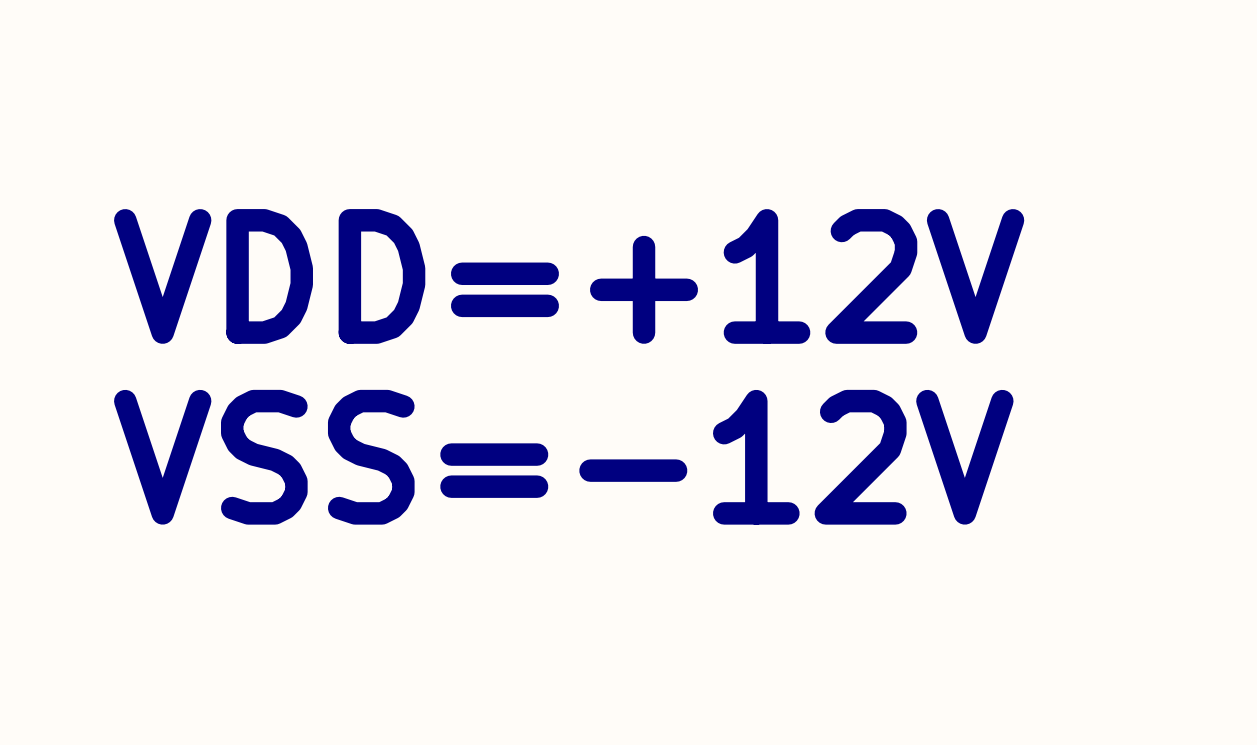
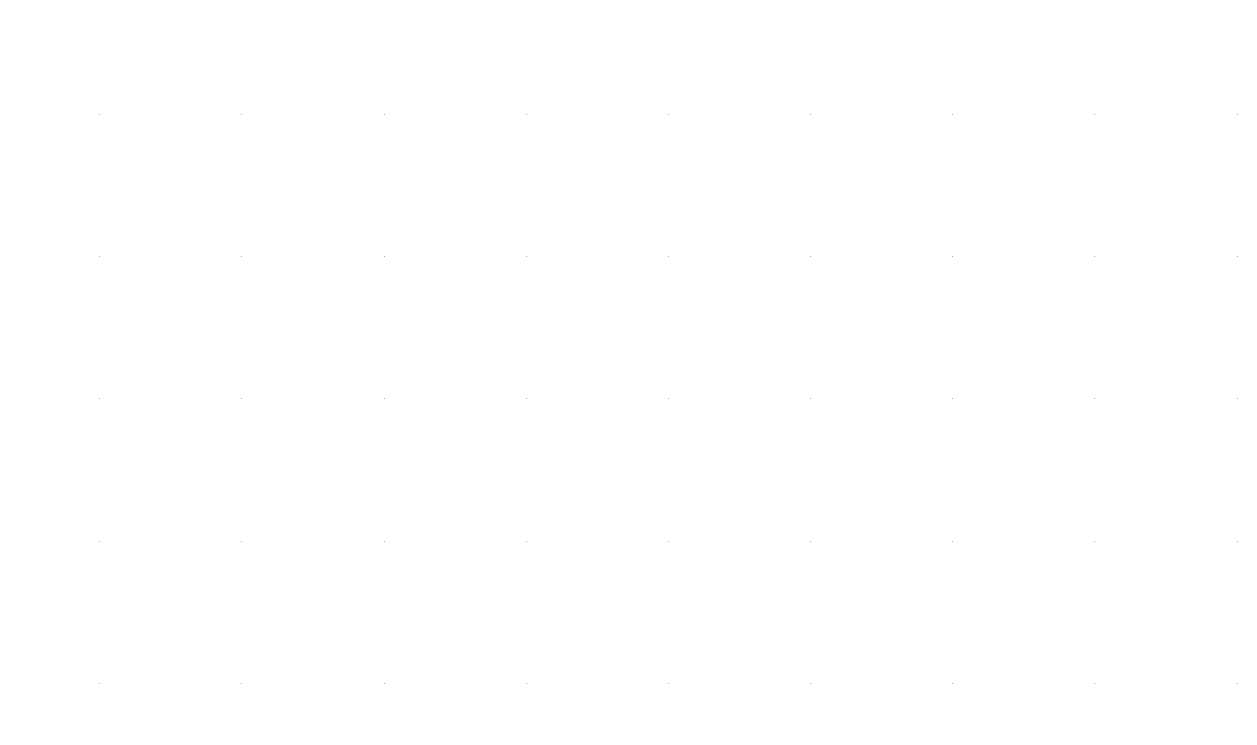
text: VDD=+12V (569, 276) -> none
text: VSS=-12V (563, 457) -> none

